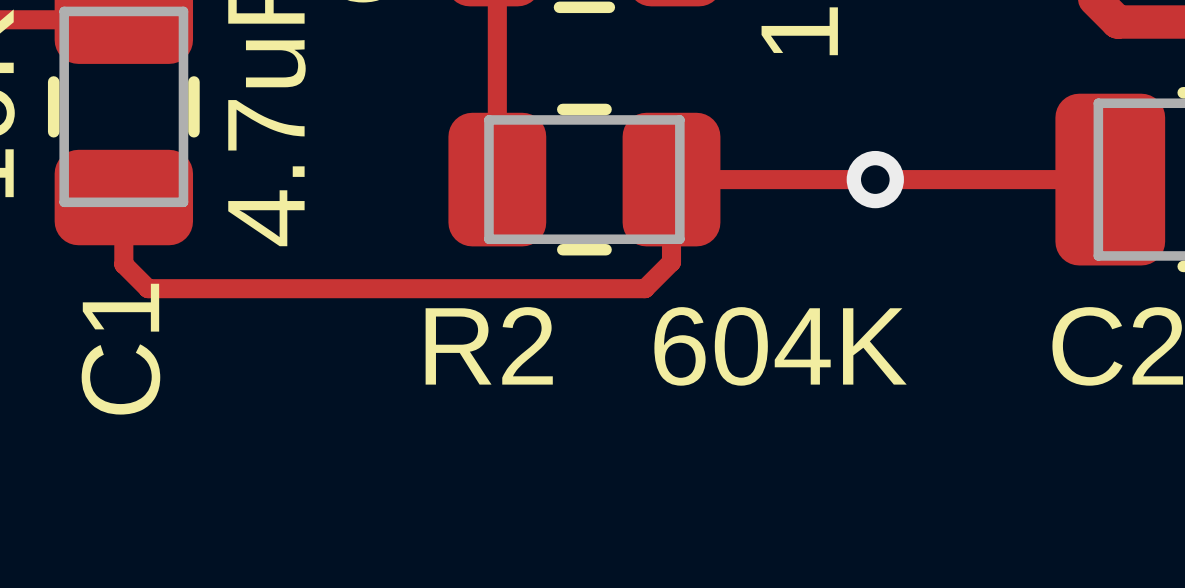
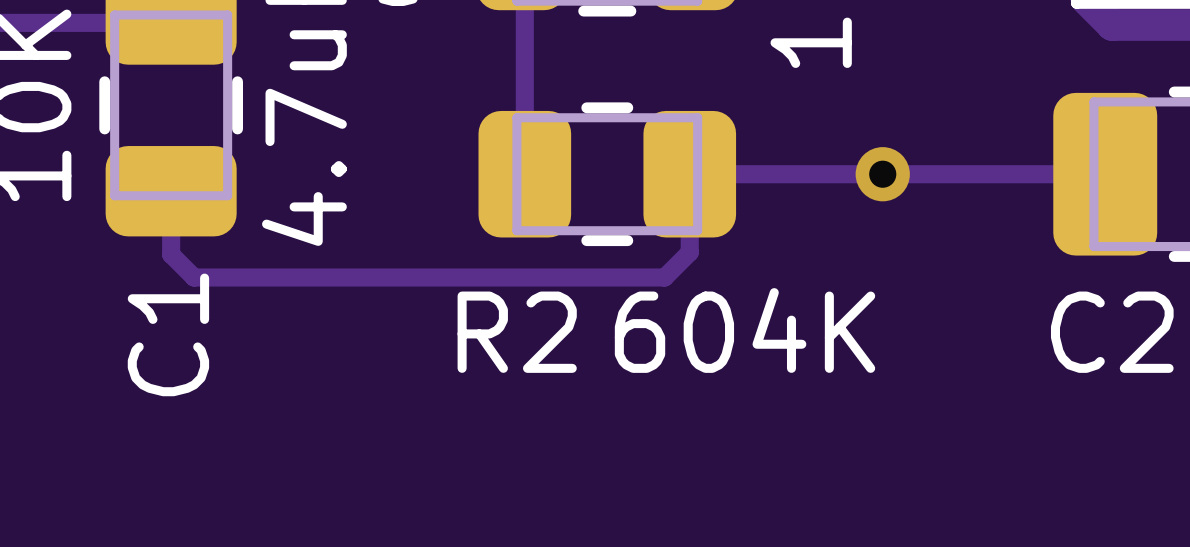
R2 value position: 604K (780, 346) -> 604K (745, 330)

